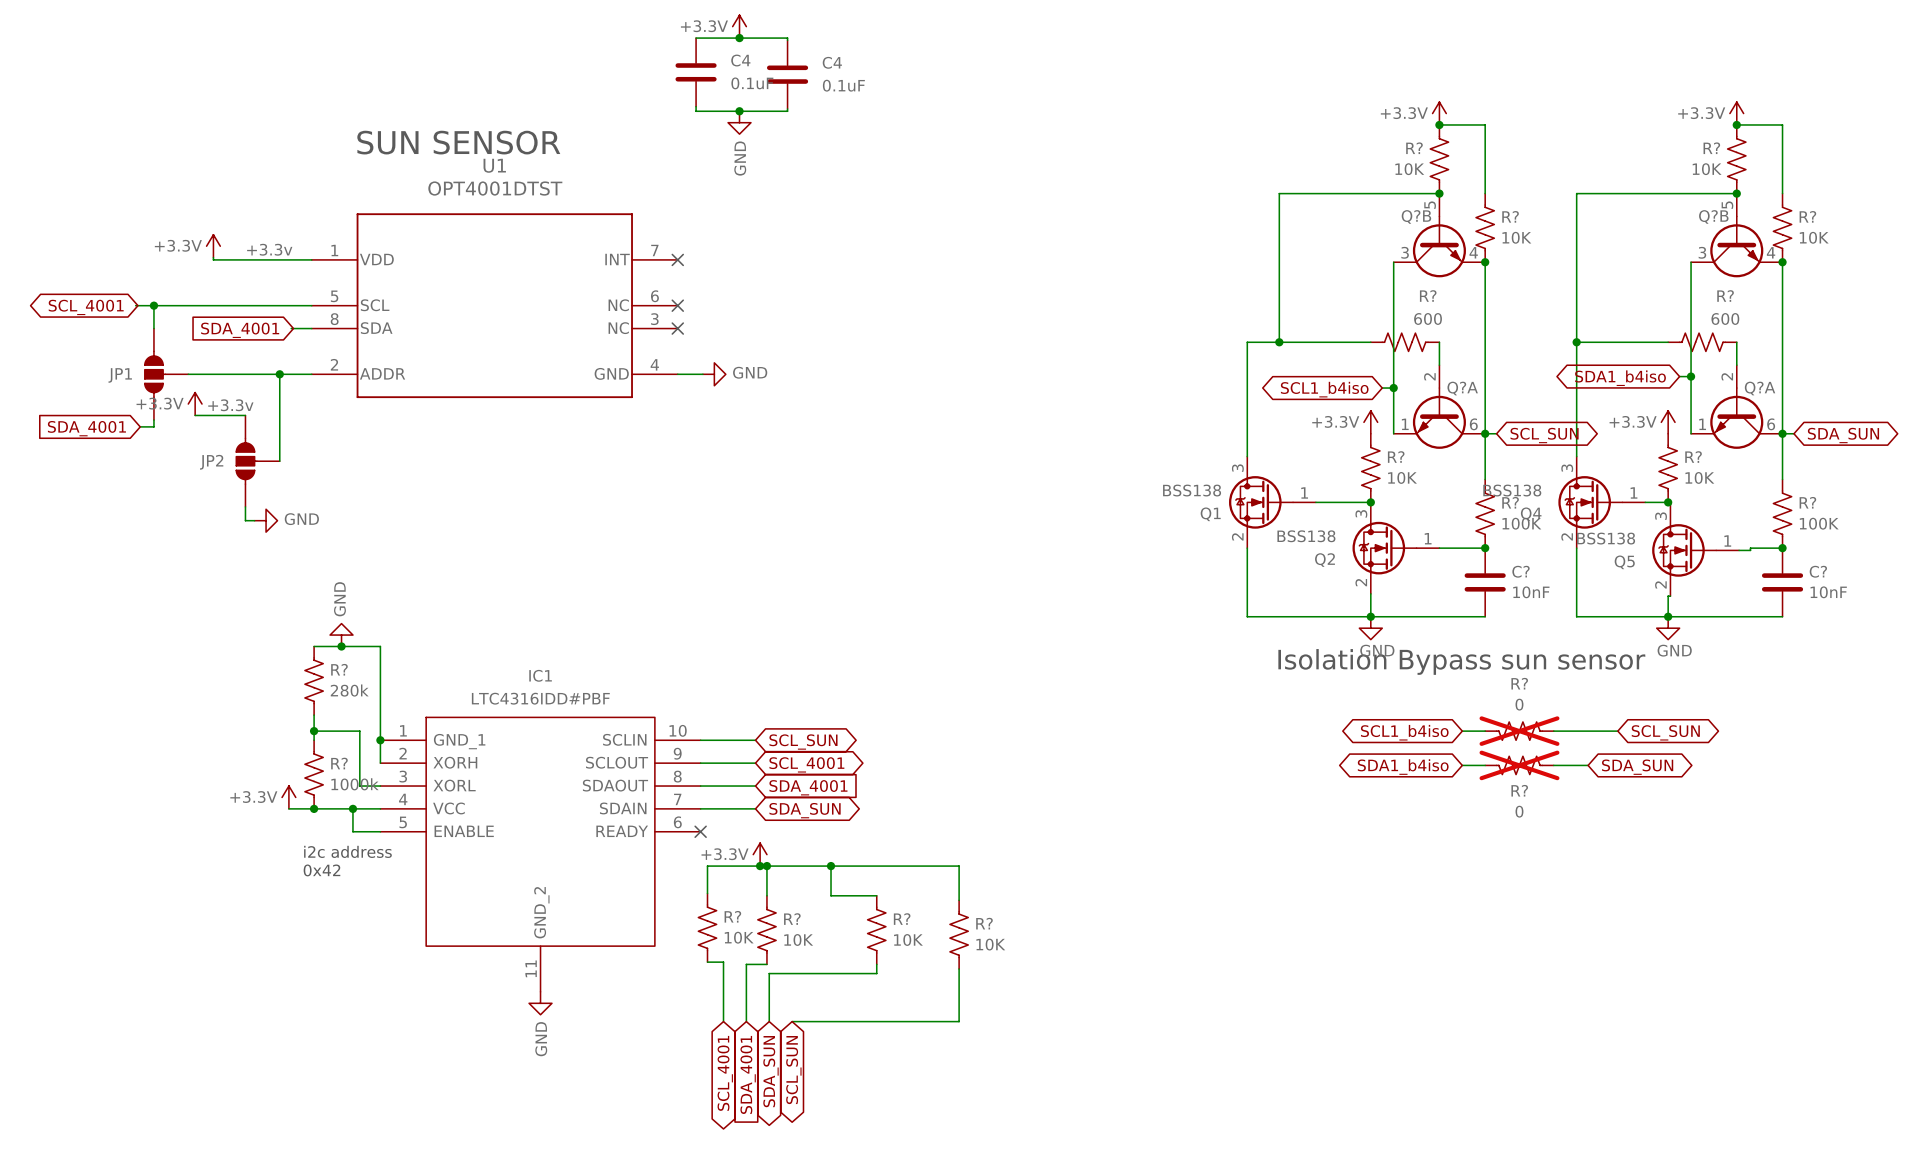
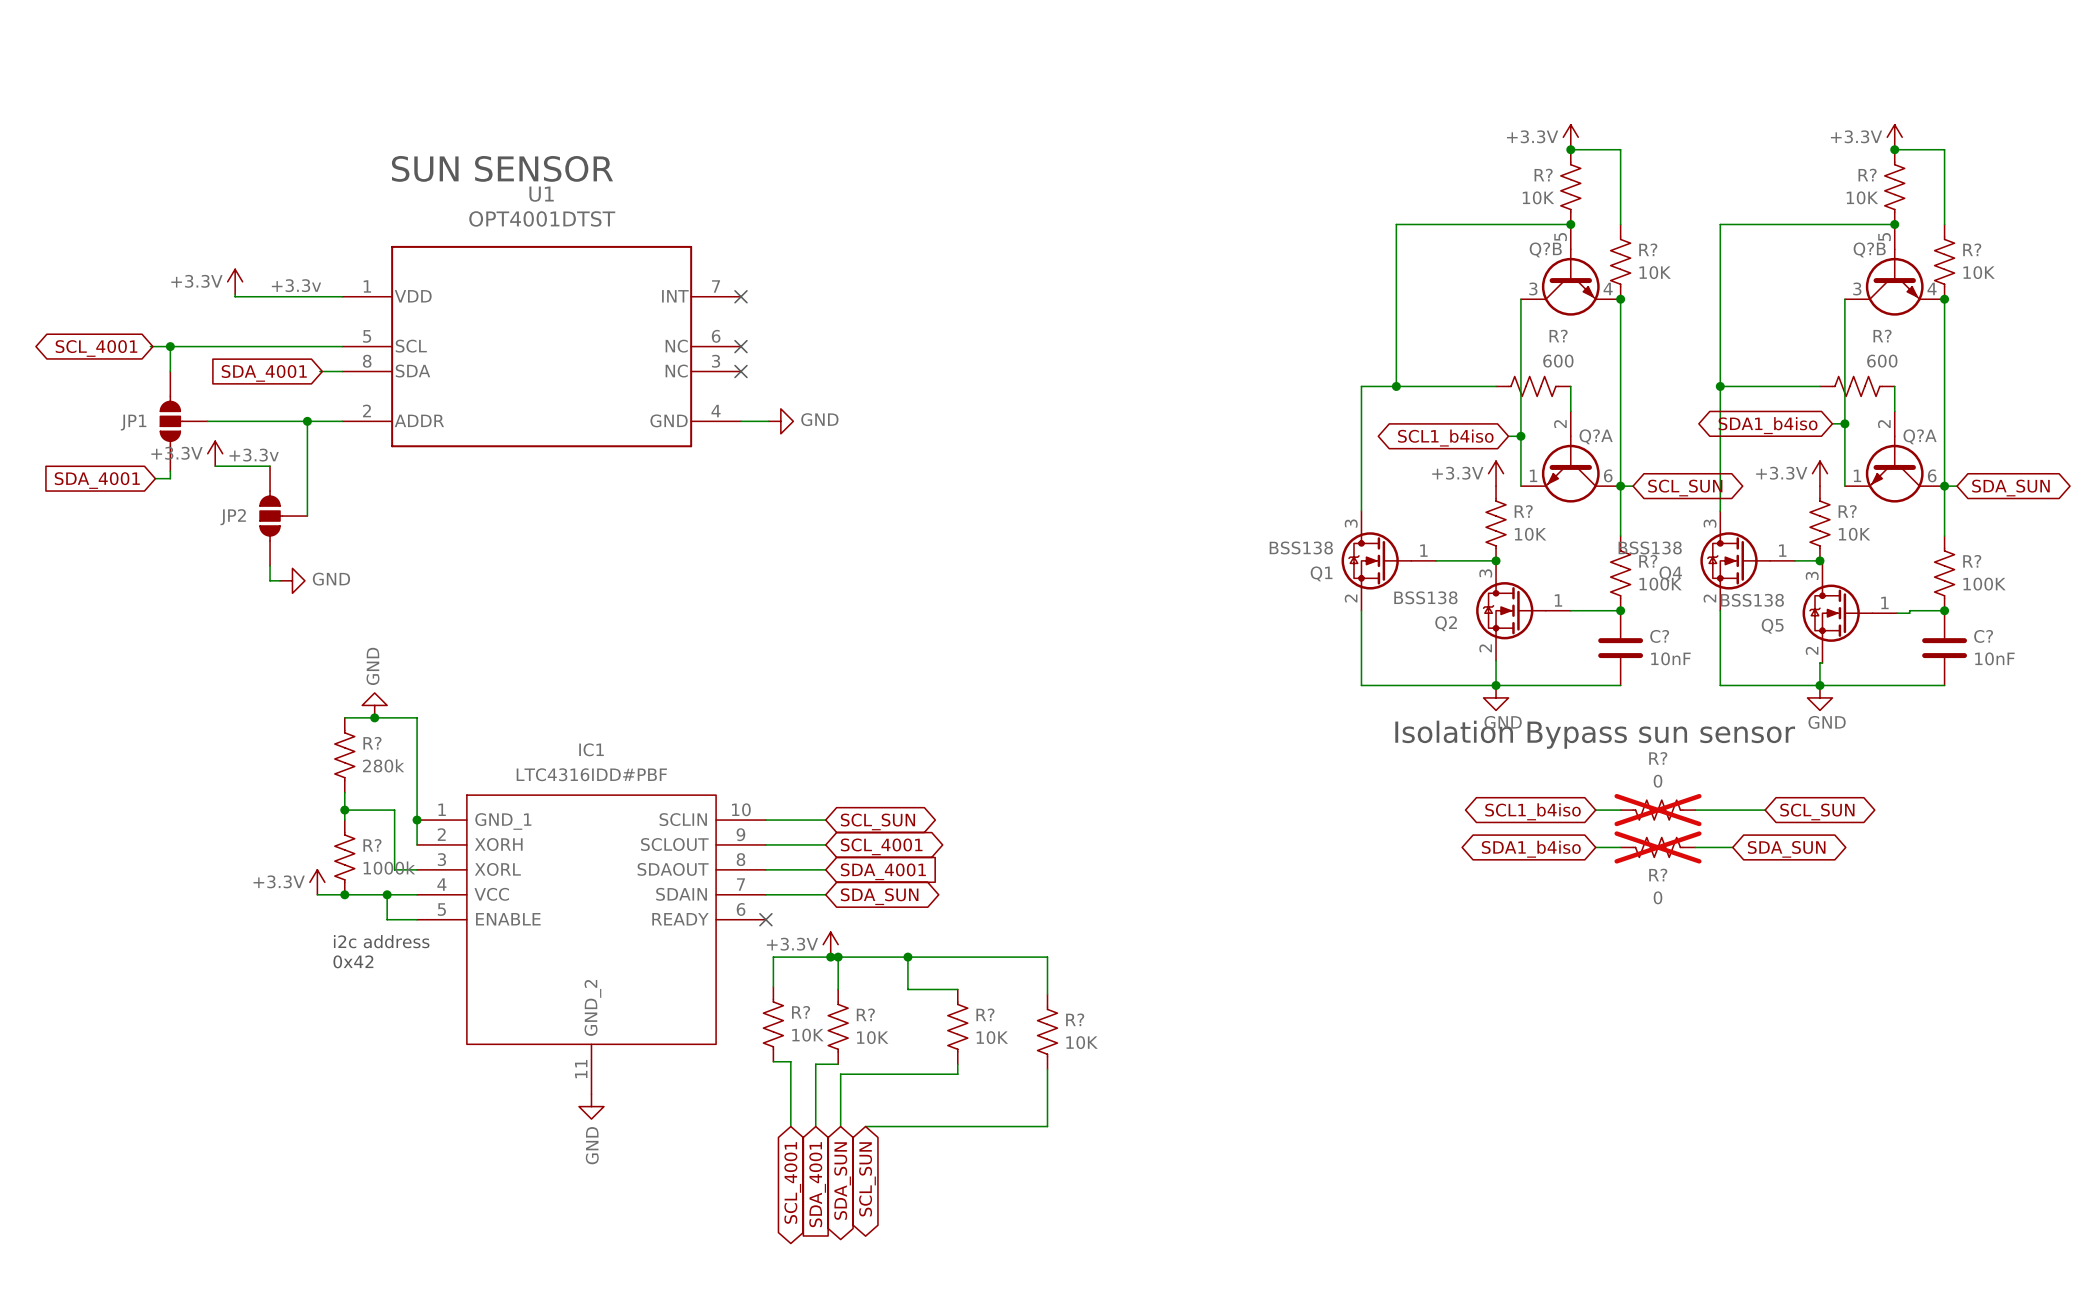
power symbol: +3.3V (739, 26) -> none
wire: (696, 38) (787, 38) (787, 40) -> none
junction: (739, 38) -> none
C4: 0.1uF (696, 72) -> none
C4: 0.1uF (787, 74) -> none
wire: (696, 106) (696, 111) (787, 111) (787, 108) -> none
junction: (739, 111) -> none
power symbol: GND (739, 122) -> none

